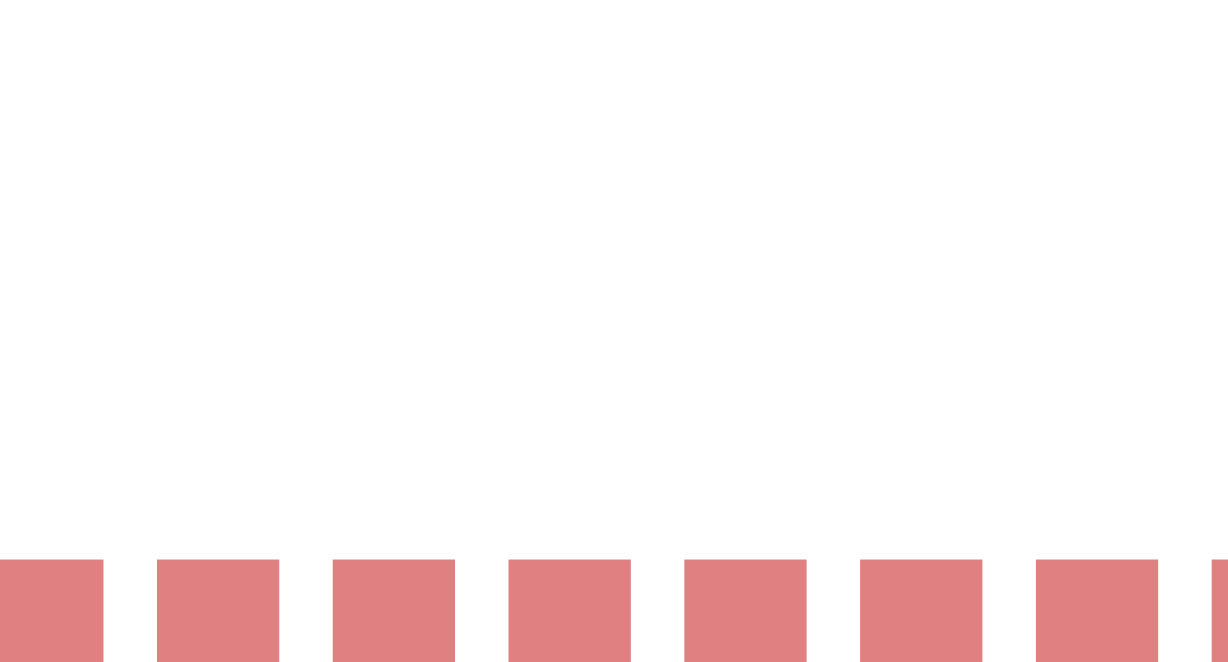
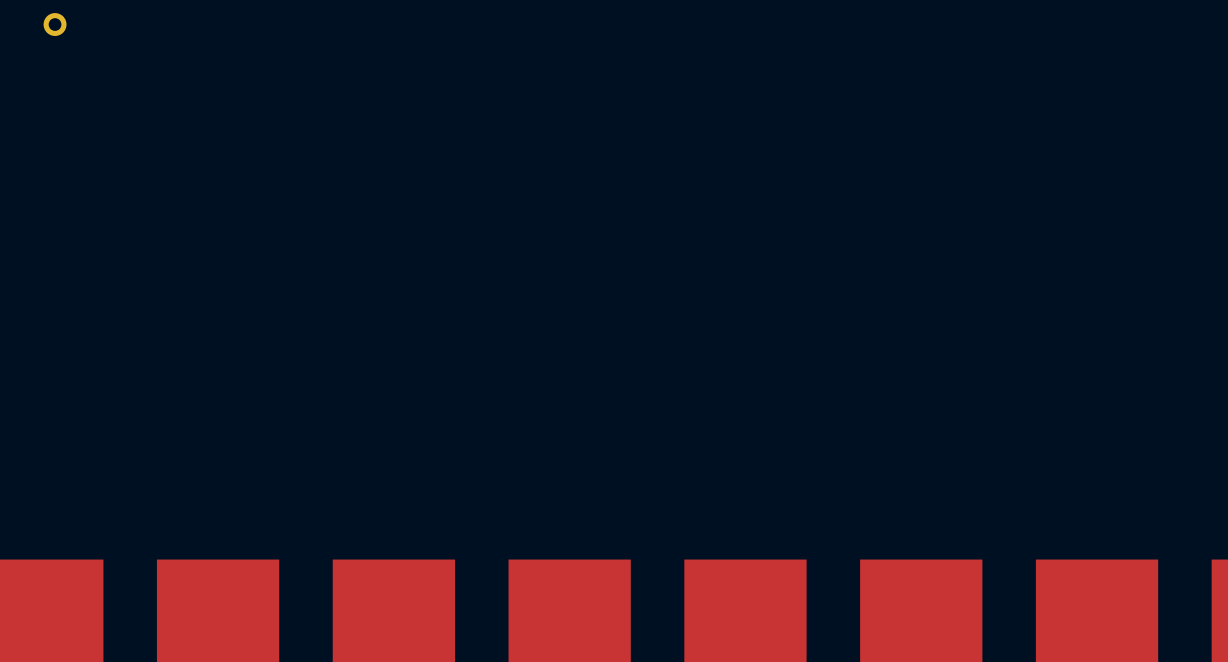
part: none -> (55, 24)

